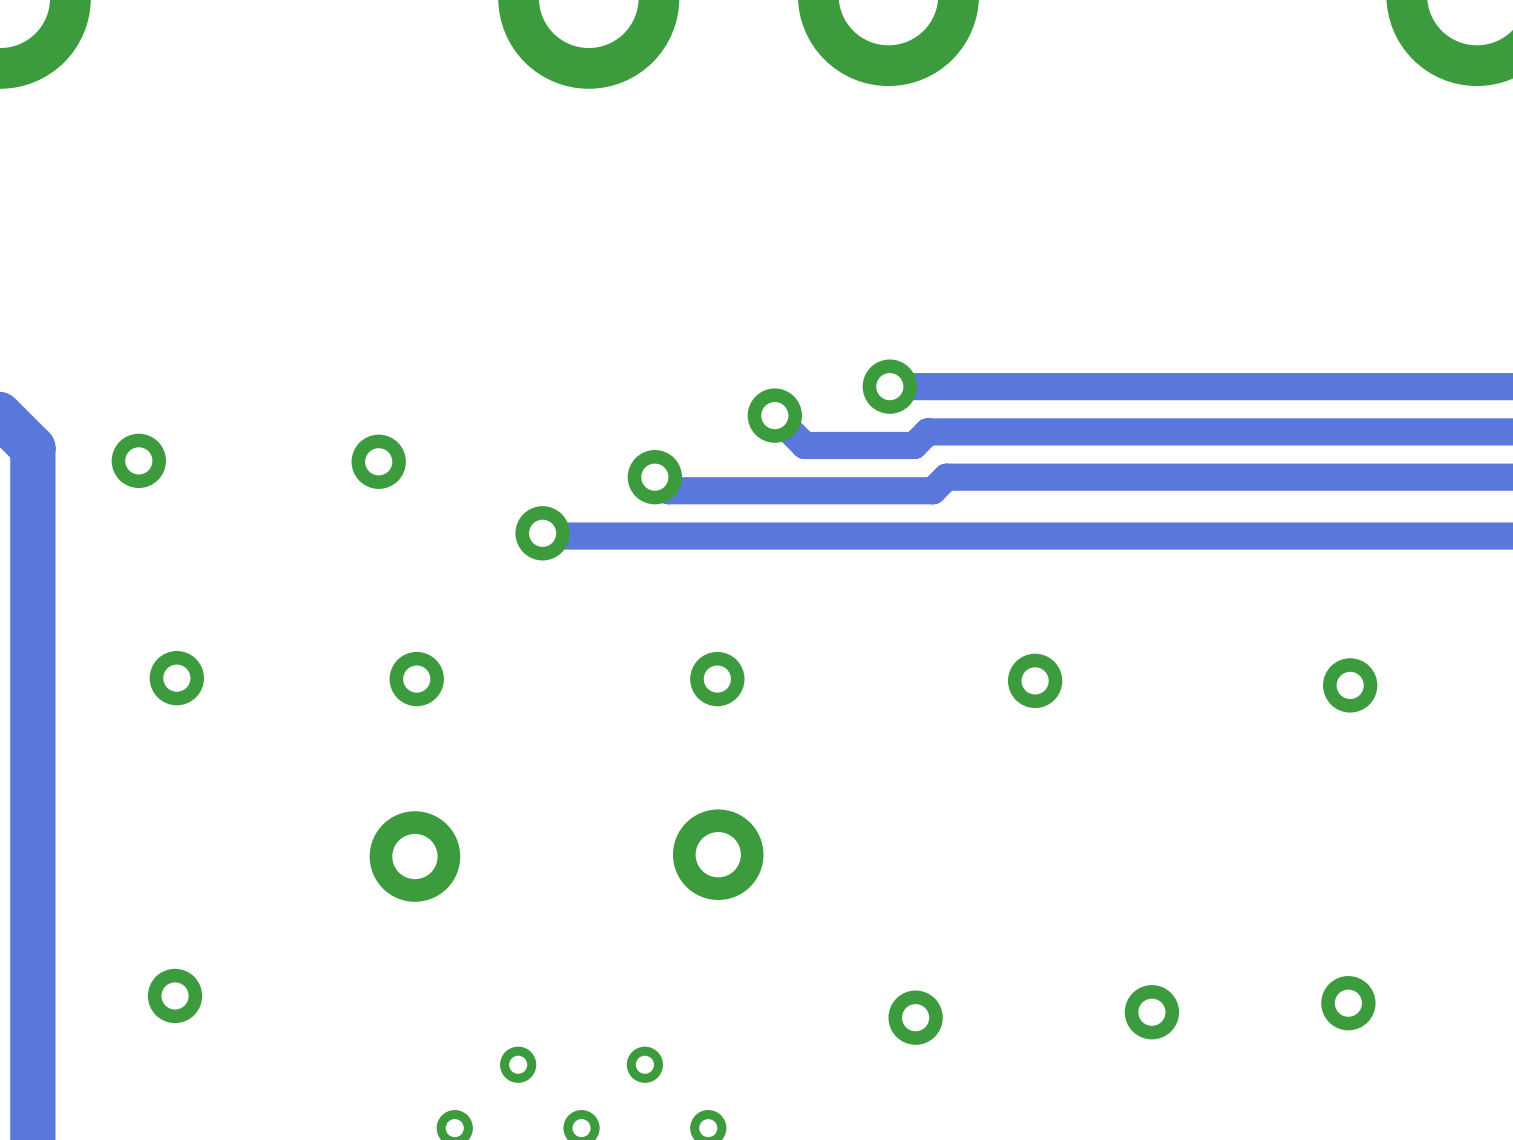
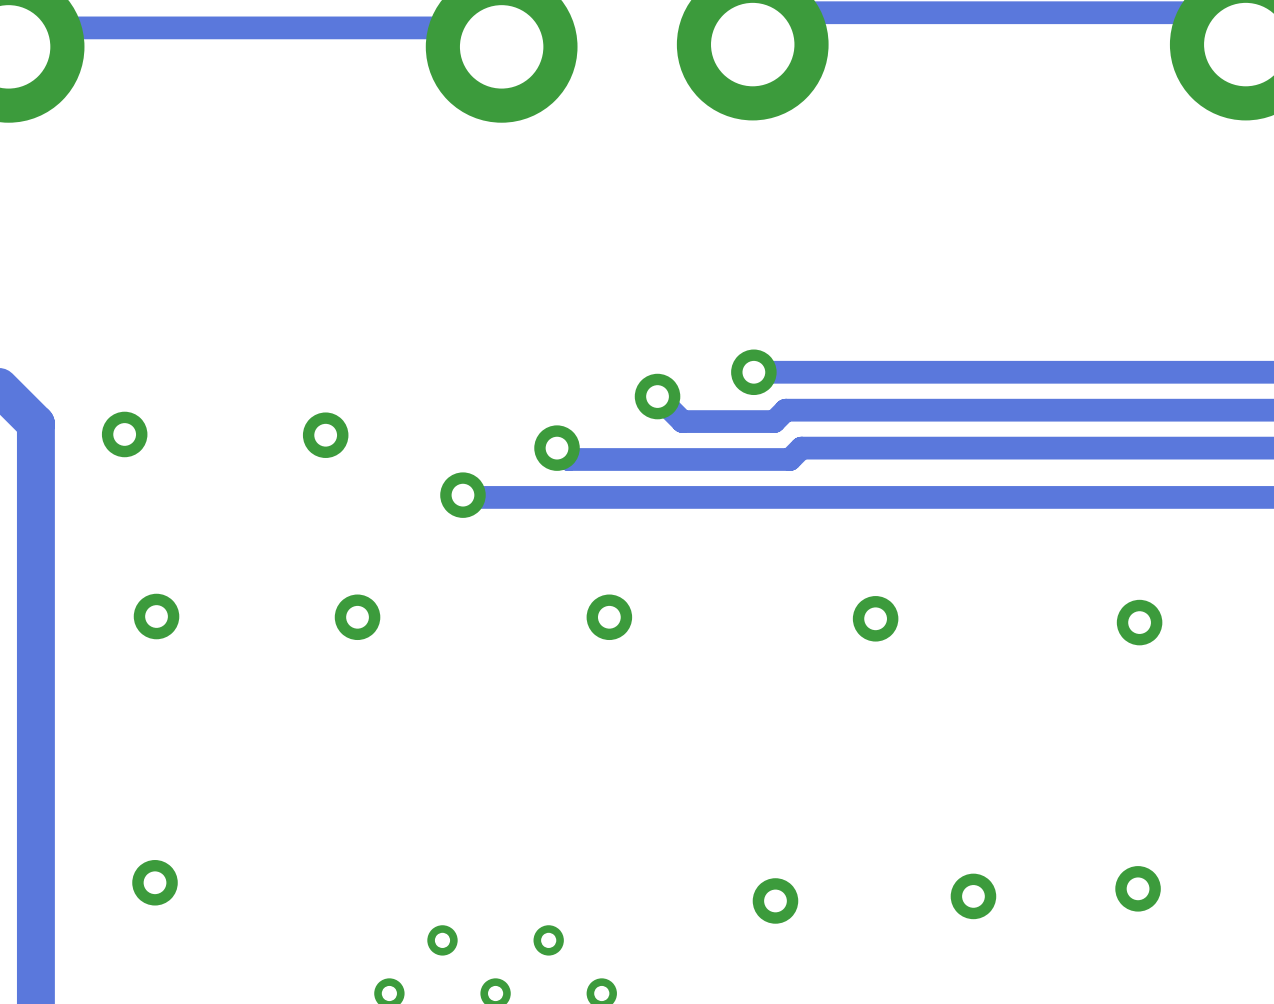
via: (718, 854) -> none
via: (414, 856) -> none

